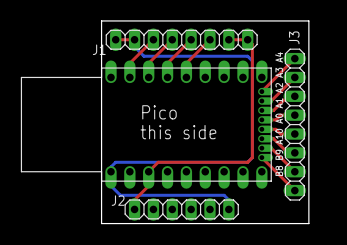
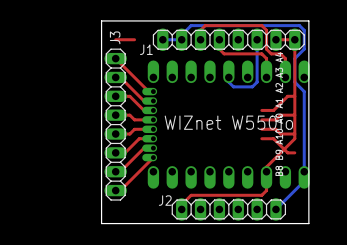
bottom track: (134, 39) (134, 46) (143, 56) (247, 56) (252, 60) (252, 157) (247, 162) (115, 162) (110, 167) (110, 185) (120, 195) (224, 195) (228, 200) (228, 209) -> none
top track: (153, 39) (129, 63) (129, 77) -> none
bottom track: none -> (162, 39) (181, 39) (181, 35) (191, 25) (299, 25) (304, 30) (304, 49) (294, 58) (294, 82) (304, 91) (304, 181) (275, 209)
top track: (172, 39) (148, 63) (148, 77) -> none
J1 position: (181, 39) -> (228, 39)
top track: (191, 39) (167, 63) (167, 77) -> none
top track: none -> (200, 39) (200, 30) (205, 25) (261, 25) (266, 30) (266, 49) (271, 53) (280, 53) (285, 58) (285, 77)
top track: (209, 39) (186, 63) (186, 77) -> none
top track: none -> (219, 39) (219, 49) (224, 53) (261, 53) (266, 58) (266, 77)
top track: (228, 39) (247, 39) (252, 44) (252, 157) (247, 162) (158, 162) (148, 171) (148, 185) (134, 200) (134, 209) -> none
bottom track: none -> (257, 39) (257, 82) (252, 86) (233, 86) (228, 82) (228, 77)
top track: none -> (275, 39) (294, 39) (294, 138) (266, 167) (266, 190) (261, 195) (191, 195) (181, 204) (181, 209)
top track: none -> (115, 58) (148, 91) (153, 91)
top track: (294, 58) (261, 91) -> none
top track: none -> (115, 77) (120, 77) (143, 101) (153, 101)
top track: (294, 77) (271, 101) (261, 101) -> none
top track: none -> (115, 96) (129, 96) (143, 110) (153, 110)
text: Pico (159, 112) -> none
top track: none -> (115, 115) (129, 115) (134, 119) (153, 119)
text: none -> WIZnet W550io (228, 122)
part side: top (146, 124) -> bottom (226, 124)
J3 position: (294, 124) -> (115, 124)
top track: none -> (153, 129) (134, 129) (129, 134) (115, 134)
text: this side (178, 132) -> none
top track: none -> (153, 138) (139, 138) (125, 152) (115, 152)
top track: none -> (153, 148) (143, 148) (120, 171) (115, 171)
top track: (261, 148) (271, 148) (294, 171) -> none
top track: none -> (153, 157) (120, 190) (115, 190)
top track: (261, 157) (294, 190) -> none
J2 position: (181, 209) -> (228, 209)

